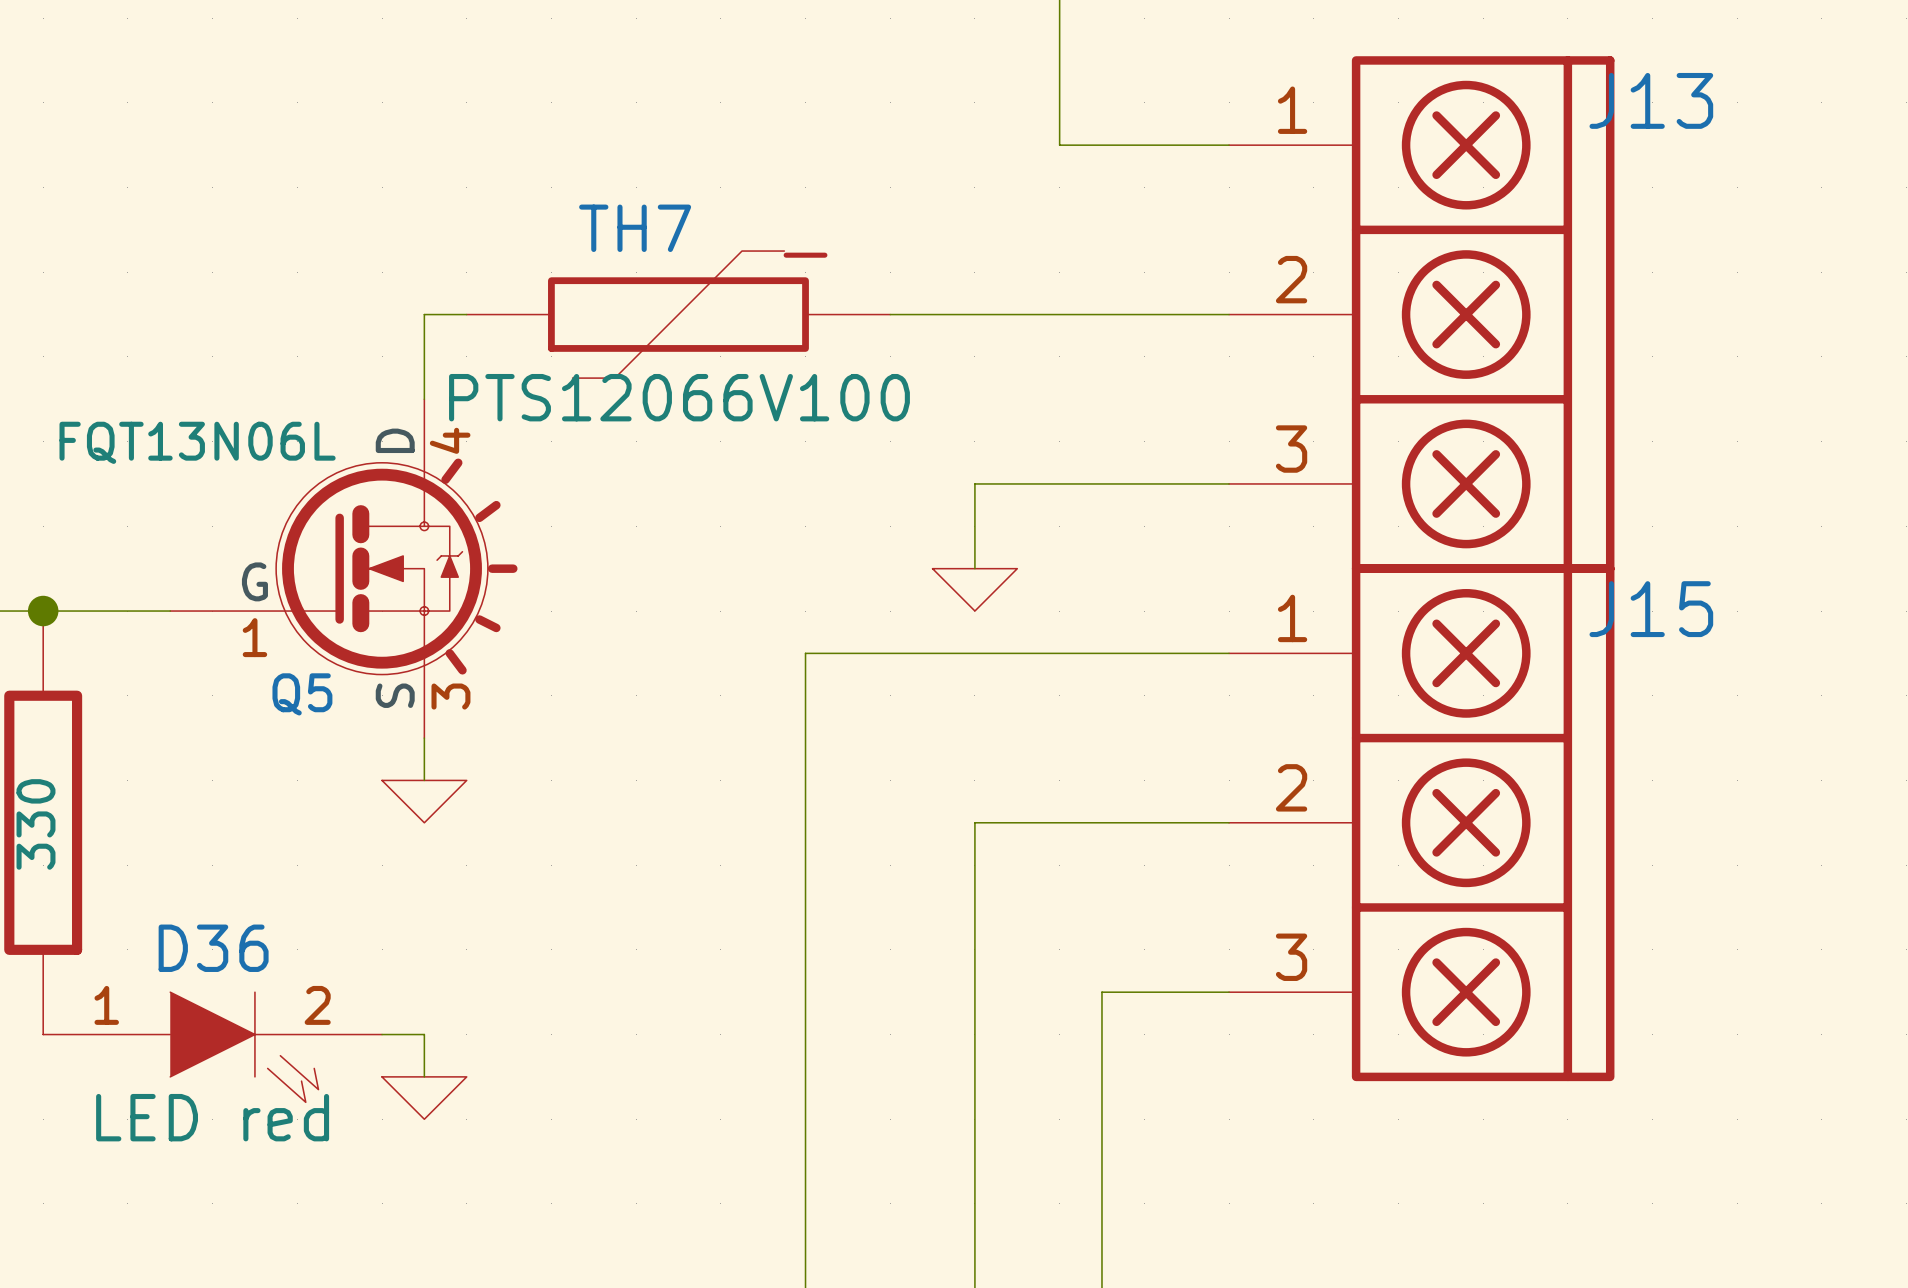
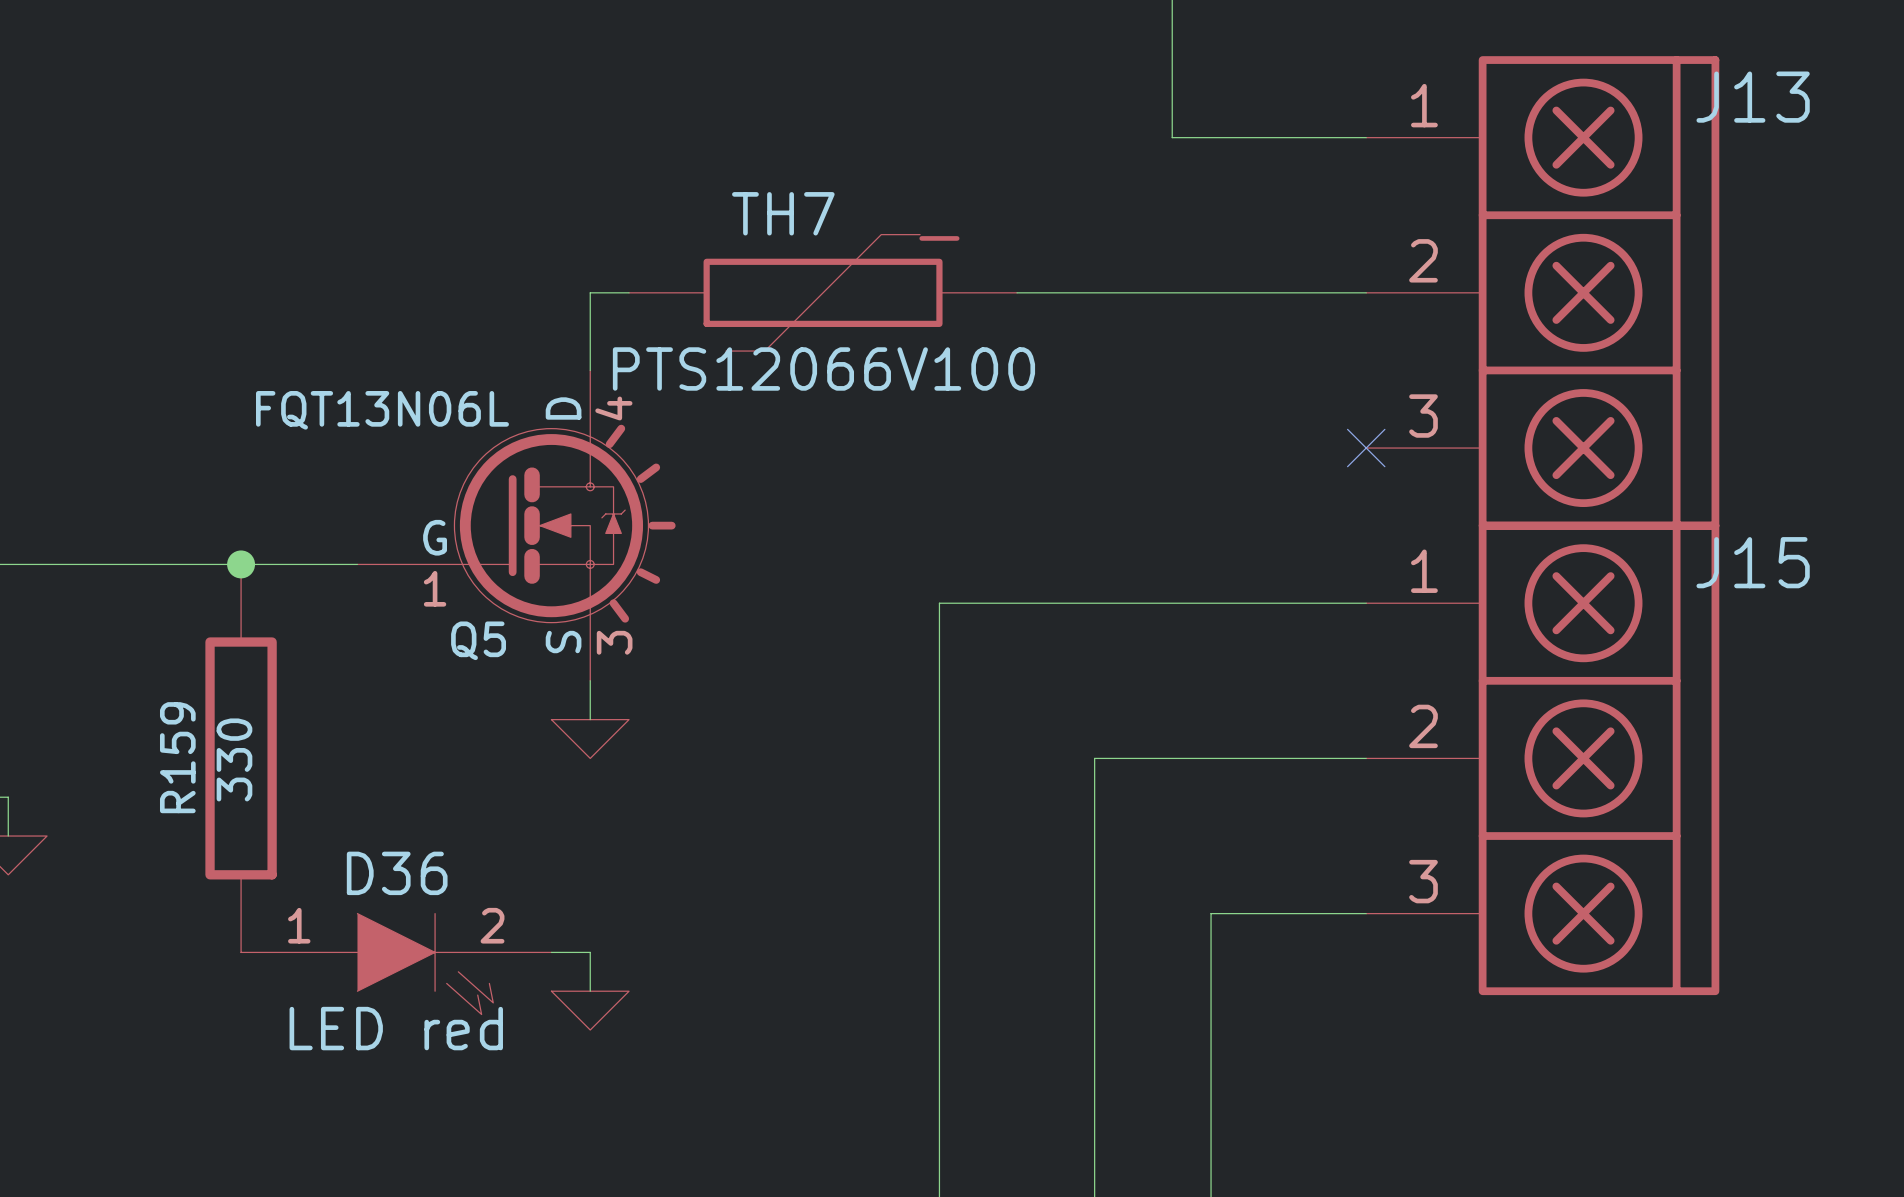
J13 position: (1421, 314) -> (1542, 292)
wire: (1229, 483) (974, 483) (974, 568) -> none
no-connect mark: none -> (1366, 448)
power symbol: (974, 589) -> none
J15 position: (1421, 822) -> (1542, 758)

